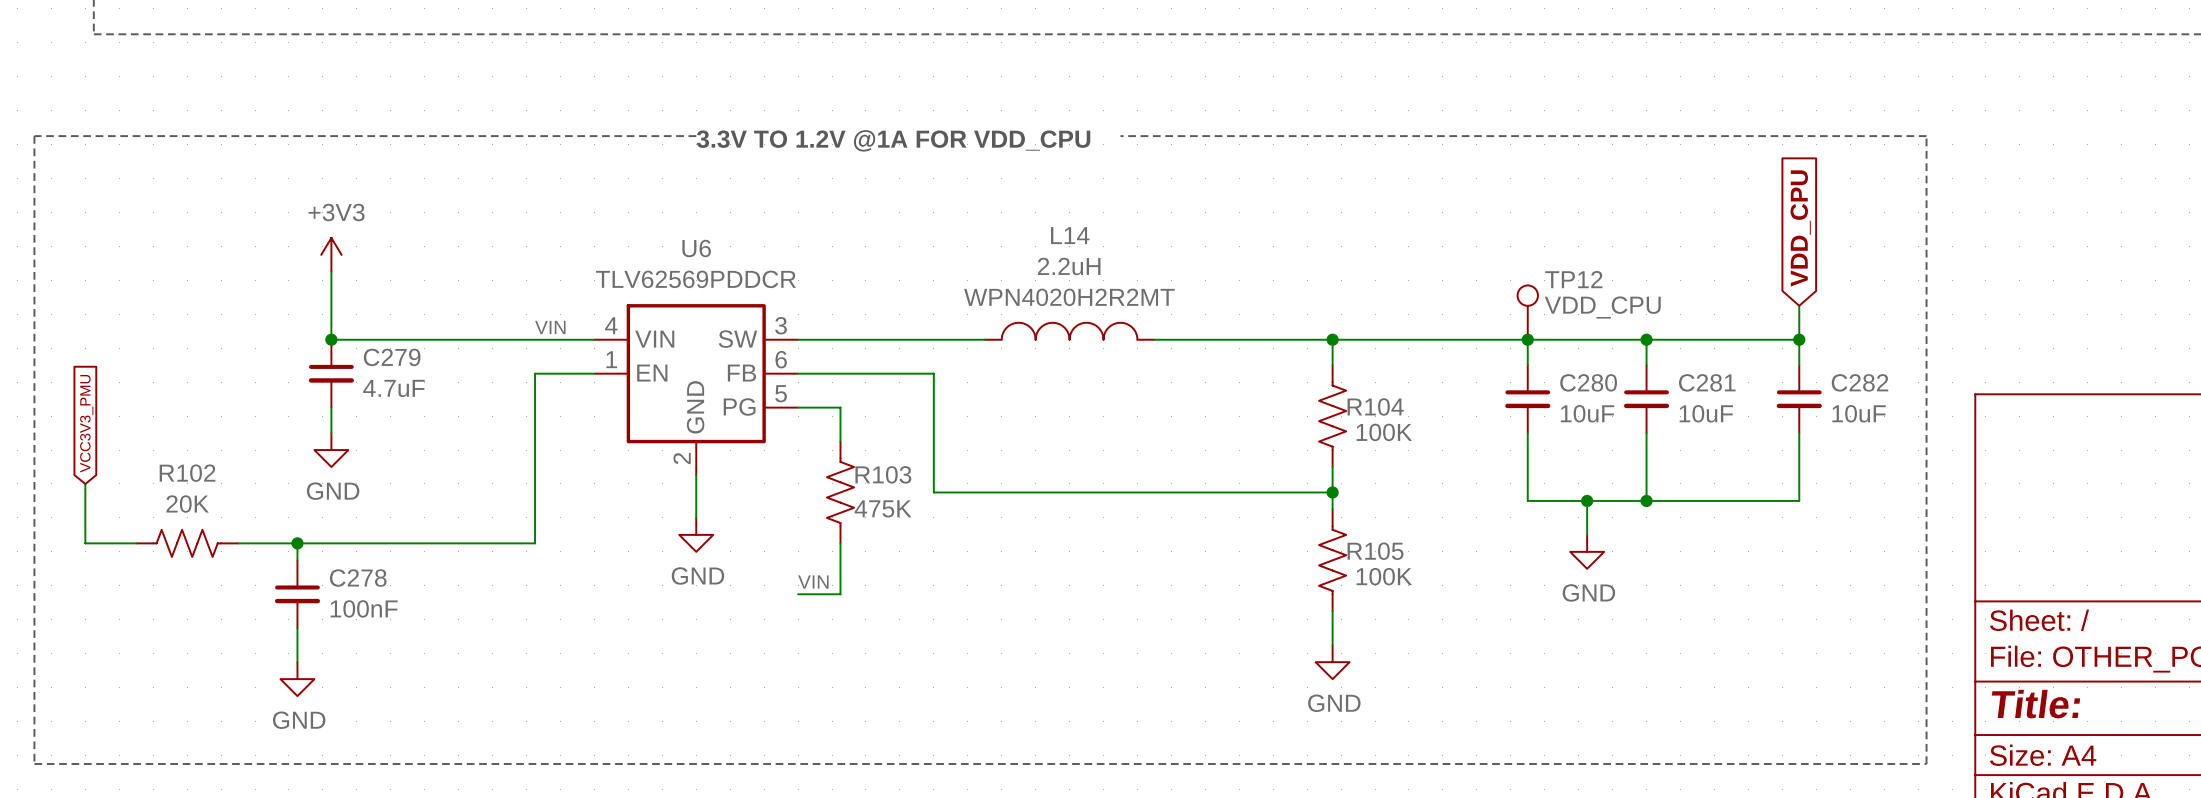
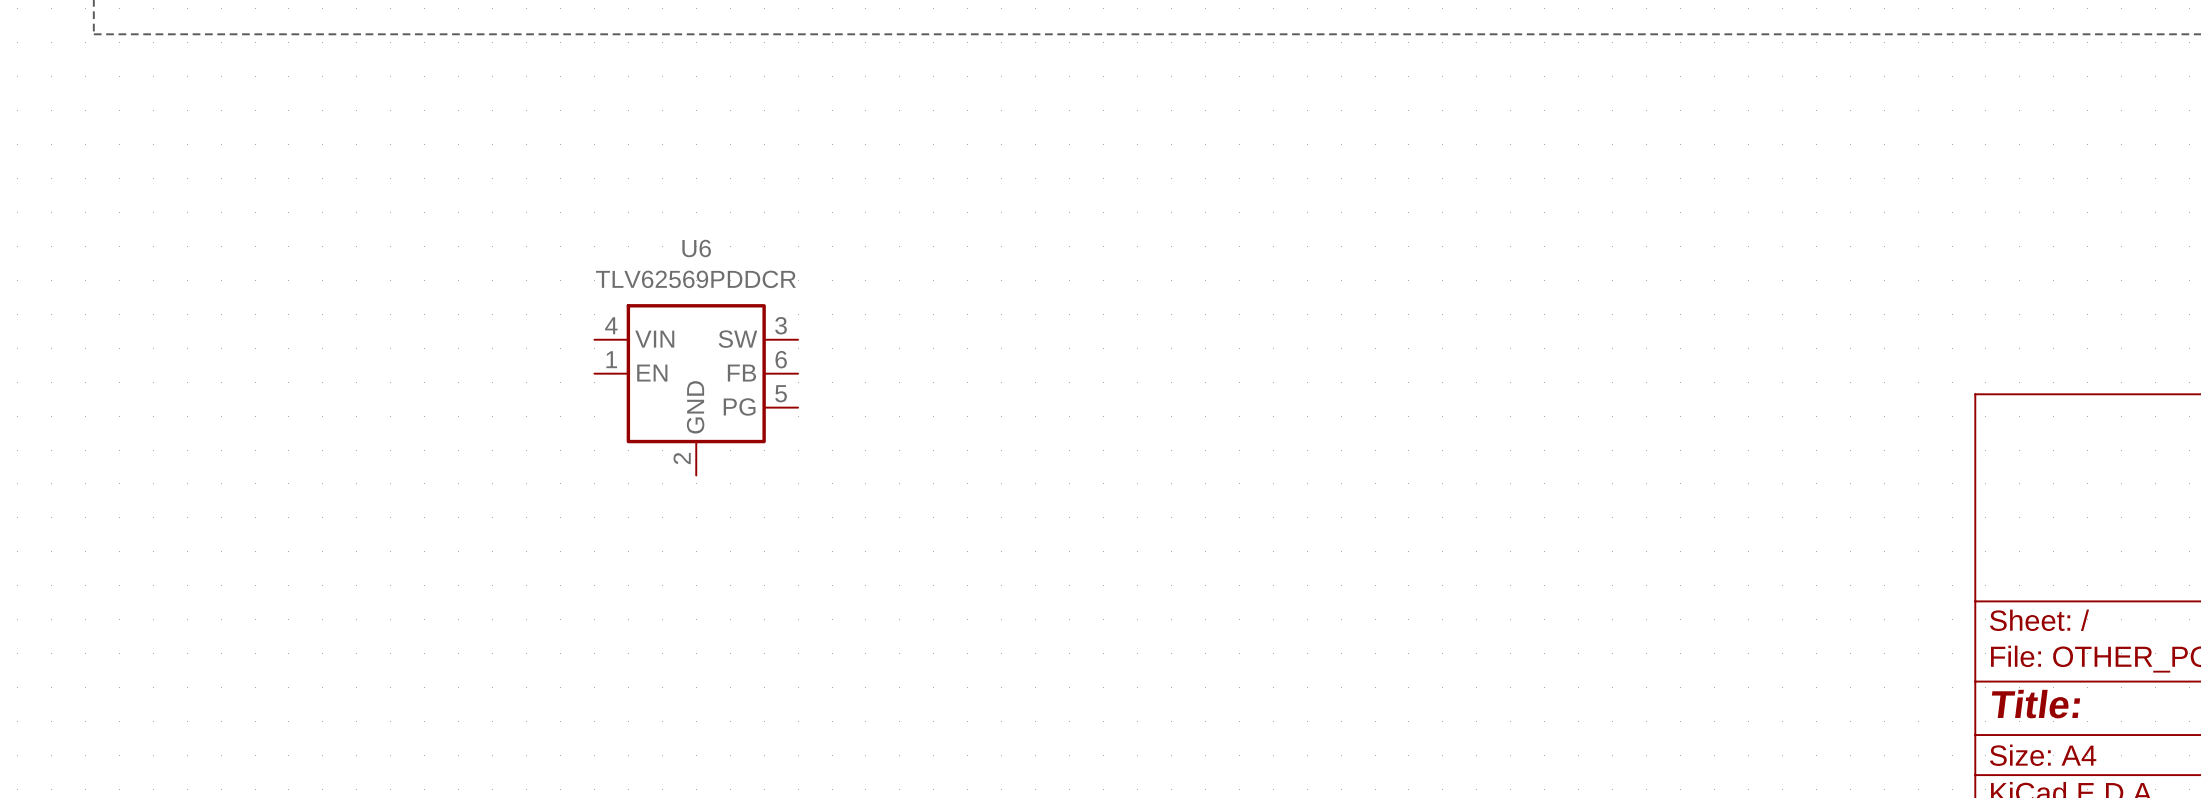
line: (696, 136) (34, 136) (34, 763) (1926, 763) (1926, 136) (1120, 136) -> none
text: 3.3V TO 1.2V @1A FOR VDD_CPU (893, 140) -> none
global label: VDD_CPU (1800, 228) -> none
power symbol: +3V3 (331, 254) -> none
wire: (331, 271) (331, 339) (594, 339) -> none
wire: (1799, 305) (1799, 365) -> none
TP12: VDD_CPU (1527, 312) -> none
label: VIN (550, 327) -> none
L14: 2.2uH (1069, 331) -> none
junction: (331, 339) -> none
wire: (798, 339) (984, 339) -> none
wire: (1154, 339) (1799, 339) -> none
wire: (1332, 339) (1332, 365) -> none
junction: (1332, 339) -> none
wire: (1527, 339) (1527, 365) -> none
junction: (1527, 339) -> none
wire: (1646, 339) (1646, 365) -> none
junction: (1646, 339) -> none
junction: (1799, 339) -> none
C279: 4.7uF (331, 373) -> none
wire: (594, 373) (535, 373) (535, 543) (238, 543) -> none
wire: (798, 373) (933, 373) (933, 492) (1332, 492) -> none
C280: 10uF (1527, 399) -> none
C281: 10uF (1646, 399) -> none
C282: 10uF (1799, 399) -> none
wire: (331, 407) (331, 433) -> none
wire: (798, 407) (840, 407) (840, 441) -> none
R104: 100K (1332, 416) -> none
global label: VCC3V3_PMU (86, 423) -> none
wire: (1527, 433) (1527, 500) (1799, 500) (1799, 433) -> none
wire: (1646, 433) (1646, 500) -> none
power symbol: GND (331, 450) -> none
wire: (1332, 467) (1332, 509) -> none
wire: (696, 475) (696, 517) -> none
wire: (85, 483) (85, 543) (136, 543) -> none
R103: 475K (840, 492) -> none
junction: (1332, 492) -> none
wire: (1587, 500) (1587, 534) -> none
junction: (1587, 500) -> none
junction: (1646, 500) -> none
power symbol: GND (696, 534) -> none
R102: 20K (187, 543) -> none
wire: (297, 543) (297, 560) -> none
junction: (297, 543) -> none
wire: (840, 543) (840, 594) (798, 594) -> none
power symbol: GND (1587, 551) -> none
R105: 100K (1332, 560) -> none
label: VIN (813, 582) -> none
C278: 100nF (297, 594) -> none
wire: (1332, 611) (1332, 645) -> none
wire: (297, 628) (297, 662) -> none
power symbol: GND (1332, 662) -> none
power symbol: GND (297, 679) -> none

